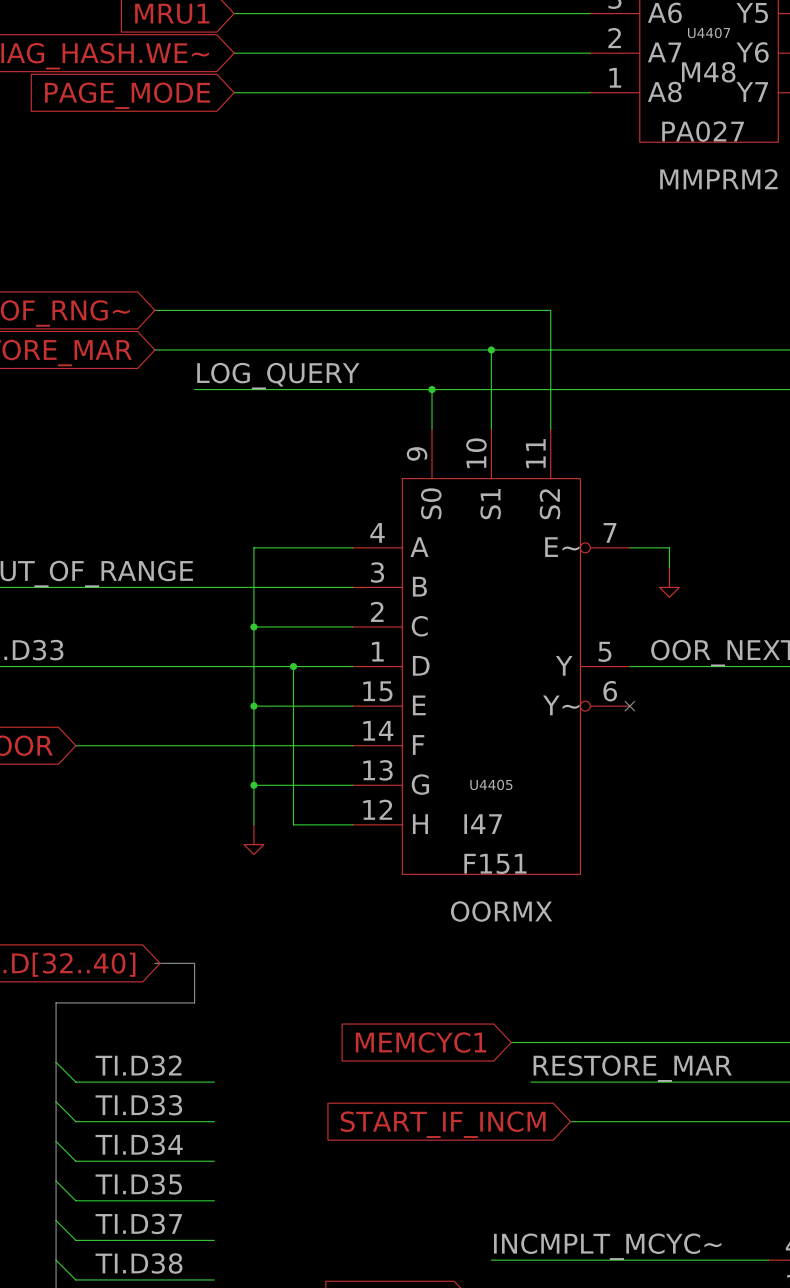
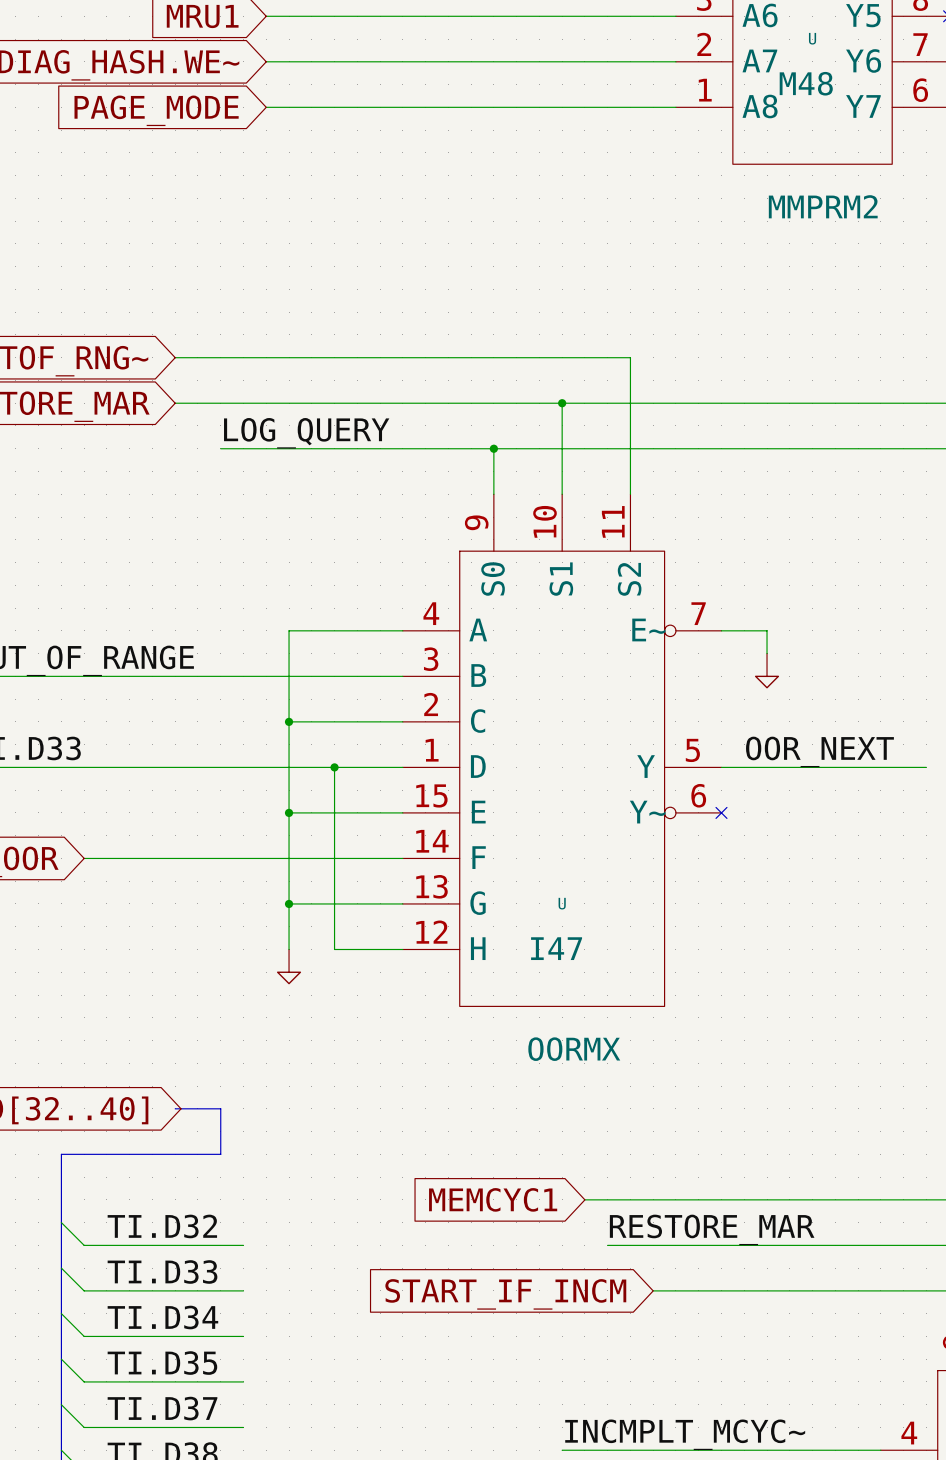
U4407 name: U4407 (709, 33) -> U (812, 38)
U4407 value: PA027 (703, 131) -> none
U4405 name: U4405 (491, 784) -> U (562, 903)
U4405 value: F151 (495, 863) -> none

